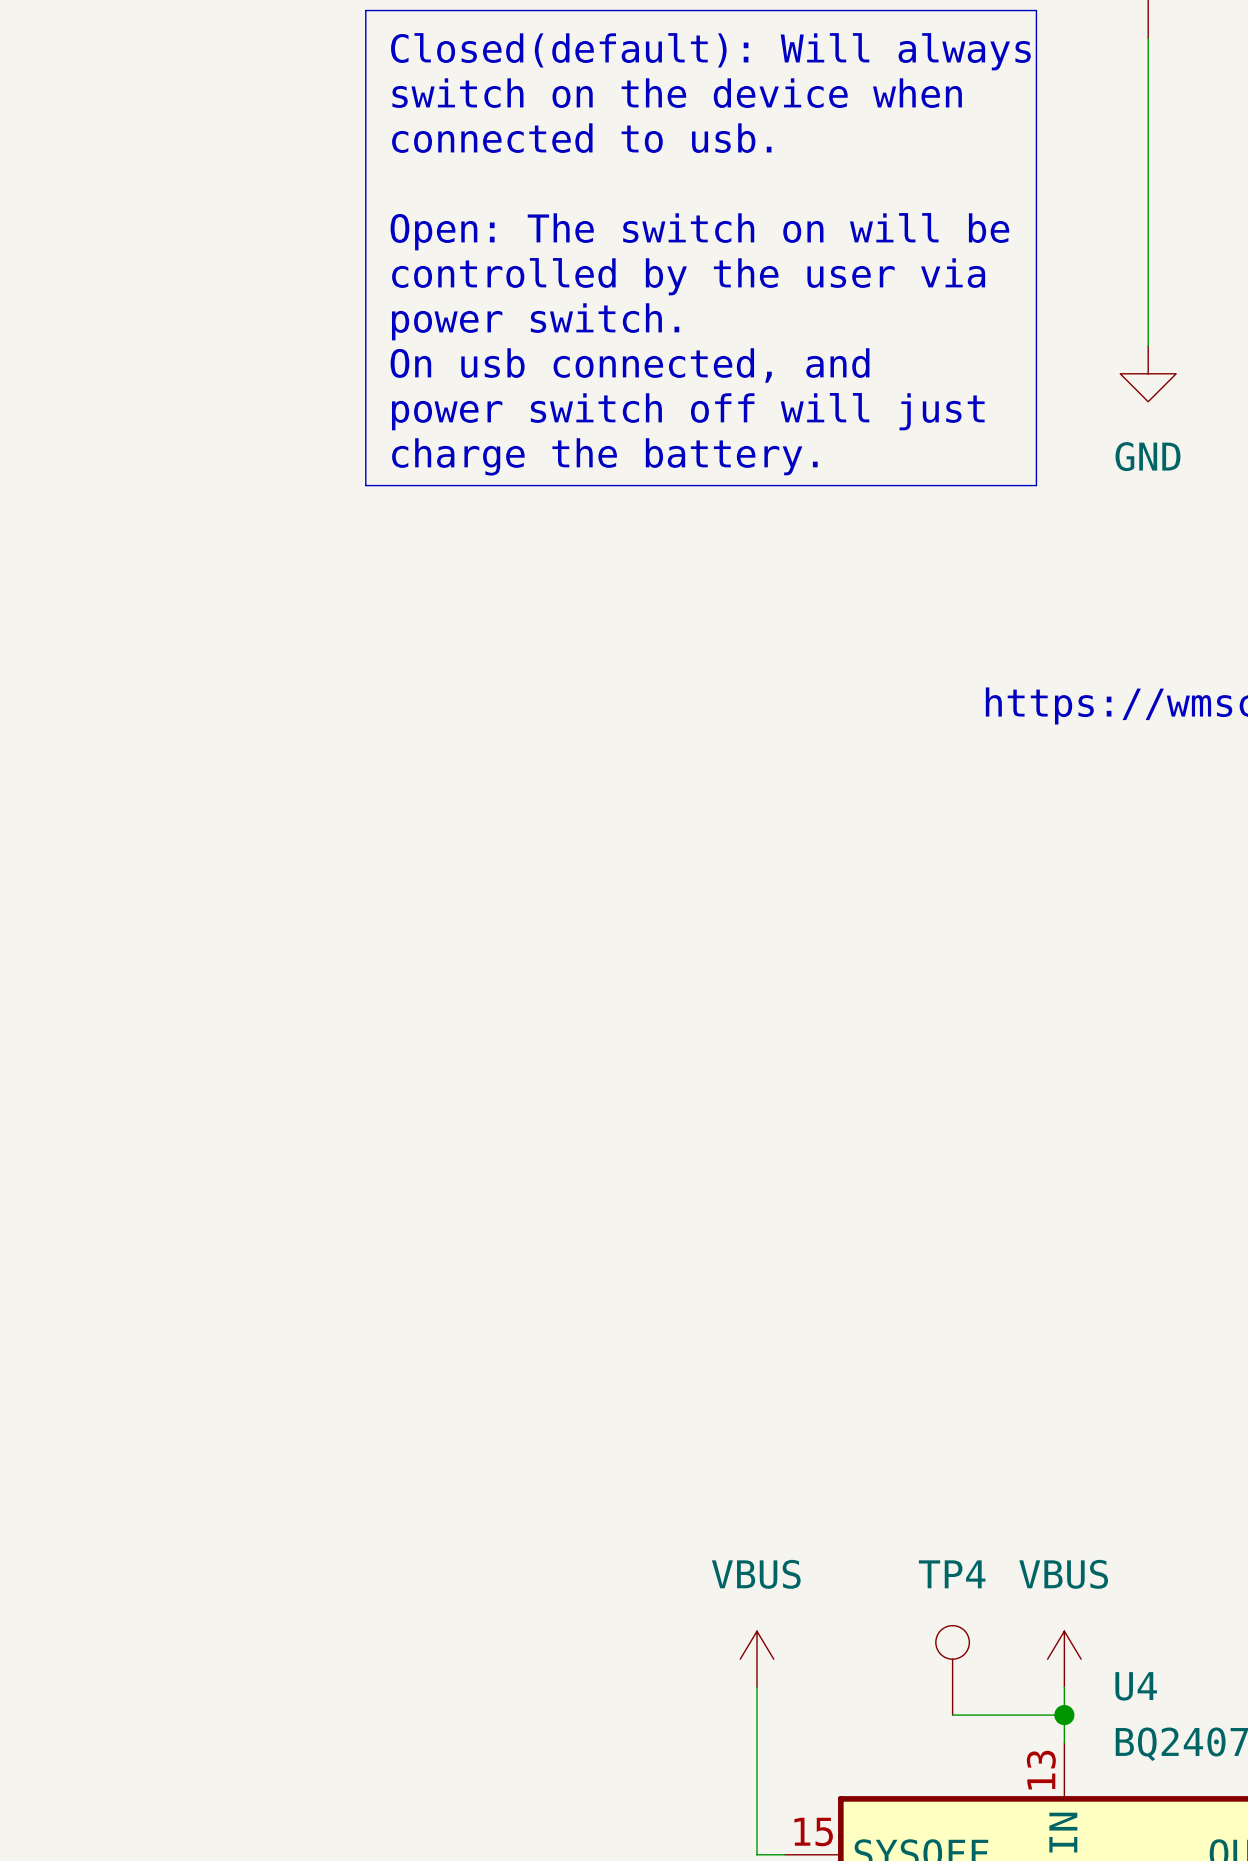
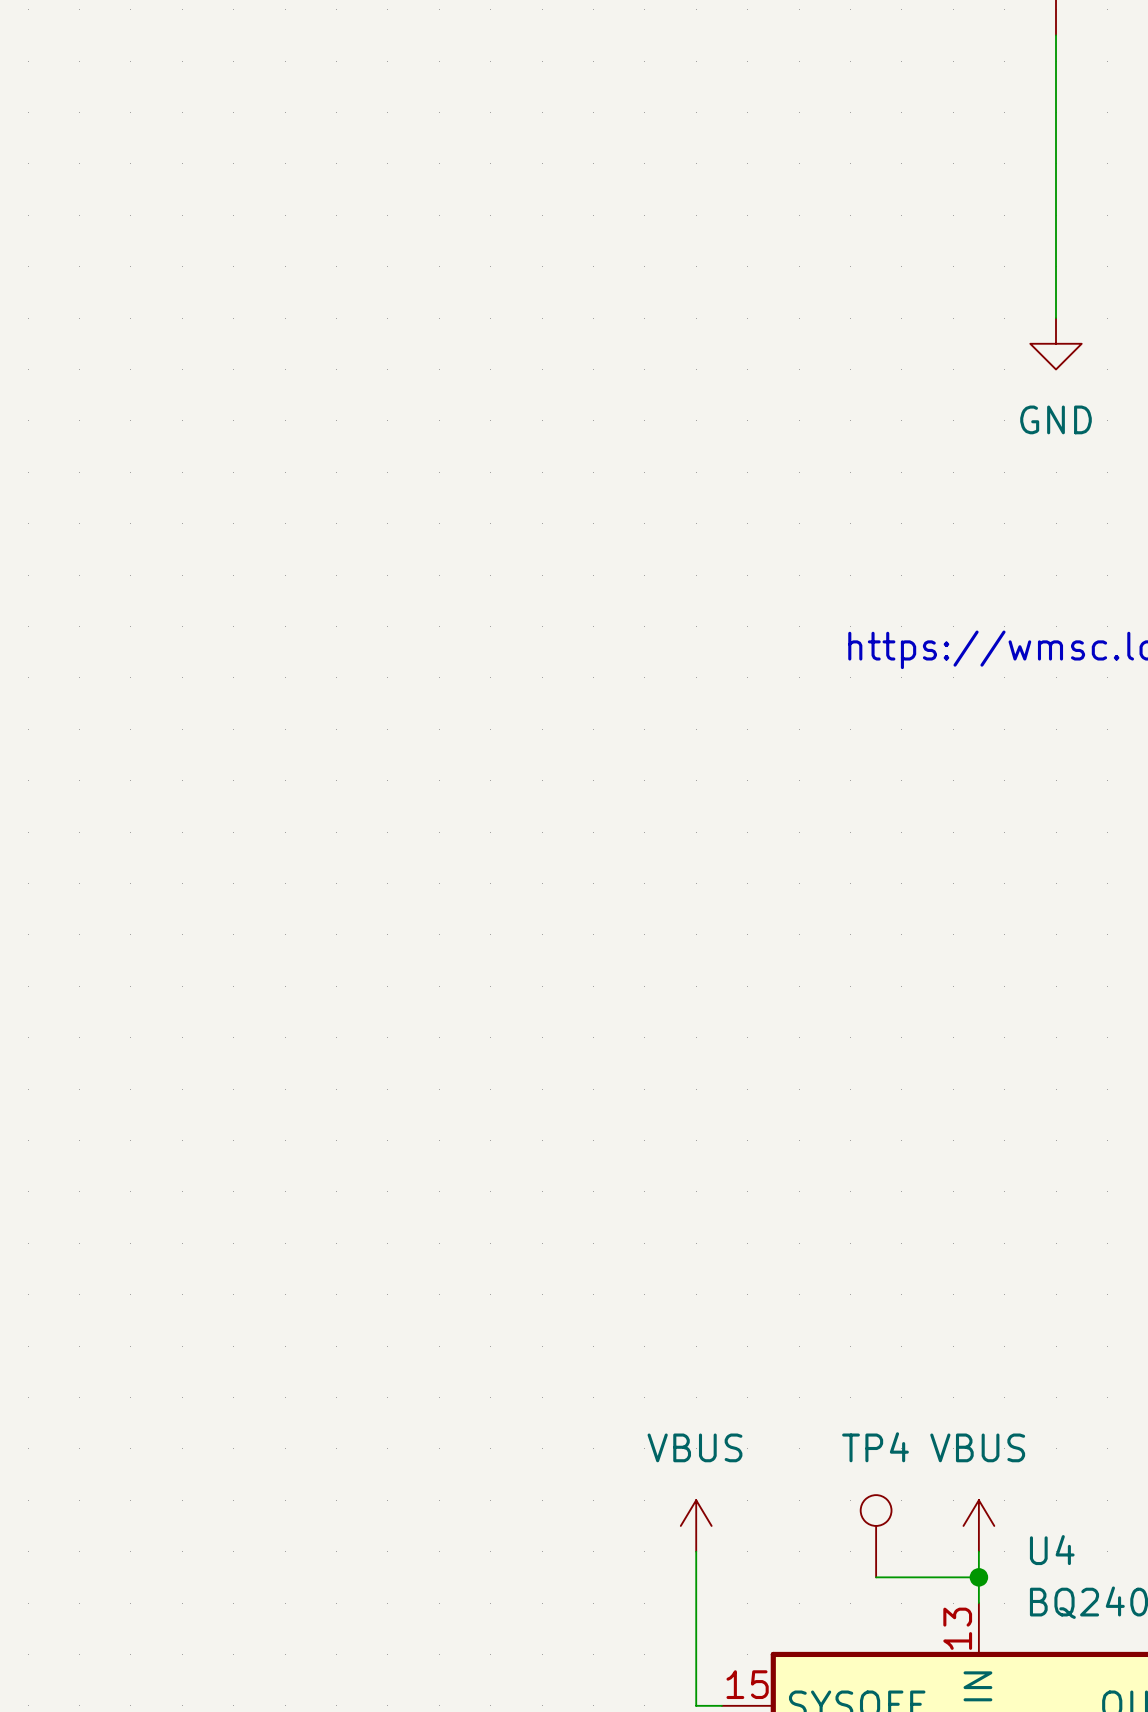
line: (365, 10) (1036, 10) (1036, 485) (365, 485) (365, 10) -> none
text: Closed(default): Will always (710, 51) -> none
text: switch on the device when (677, 93) -> none
text: connected to usb. (581, 138) -> none
text: Open: The switch on will be (699, 231) -> none
text: controlled by the user via (688, 276) -> none
text: power switch. (535, 321) -> none
text: On usb connected, and (630, 365) -> none
text: power switch off will just (688, 411) -> none
text: charge the battery. (604, 456) -> none

